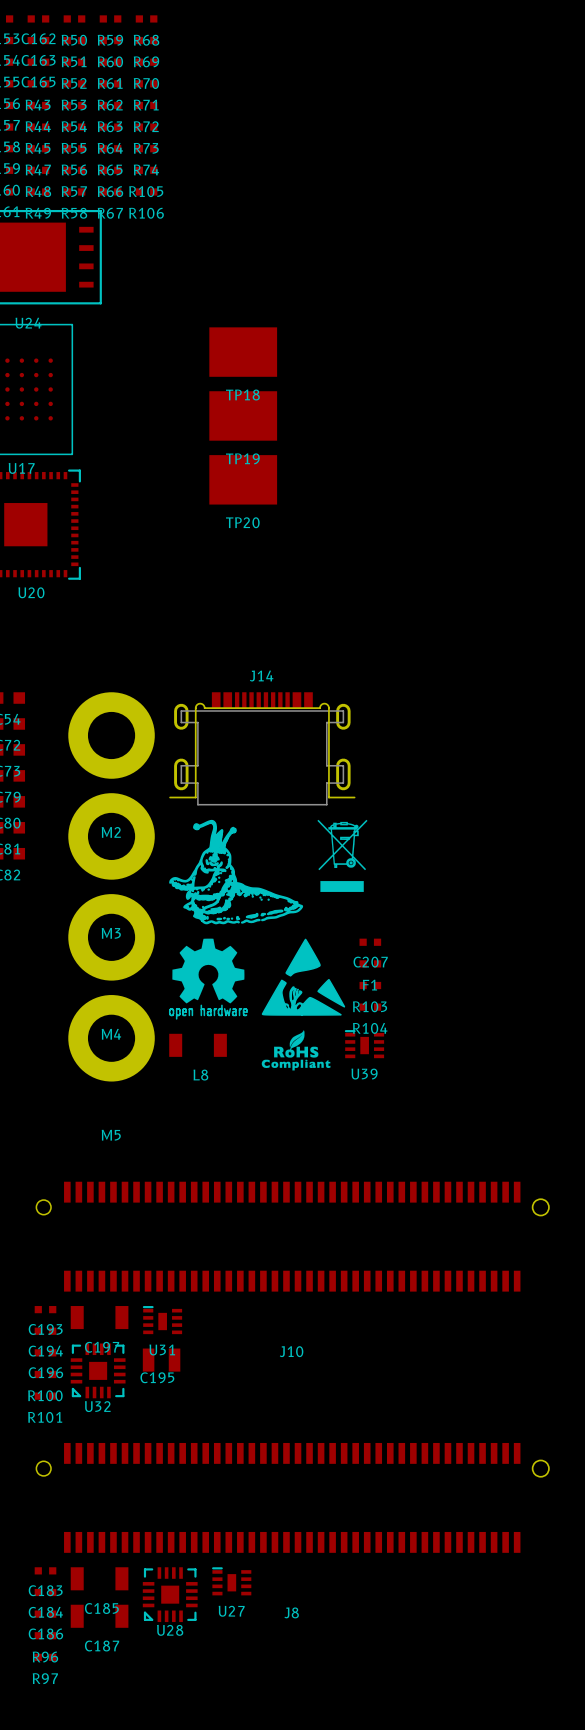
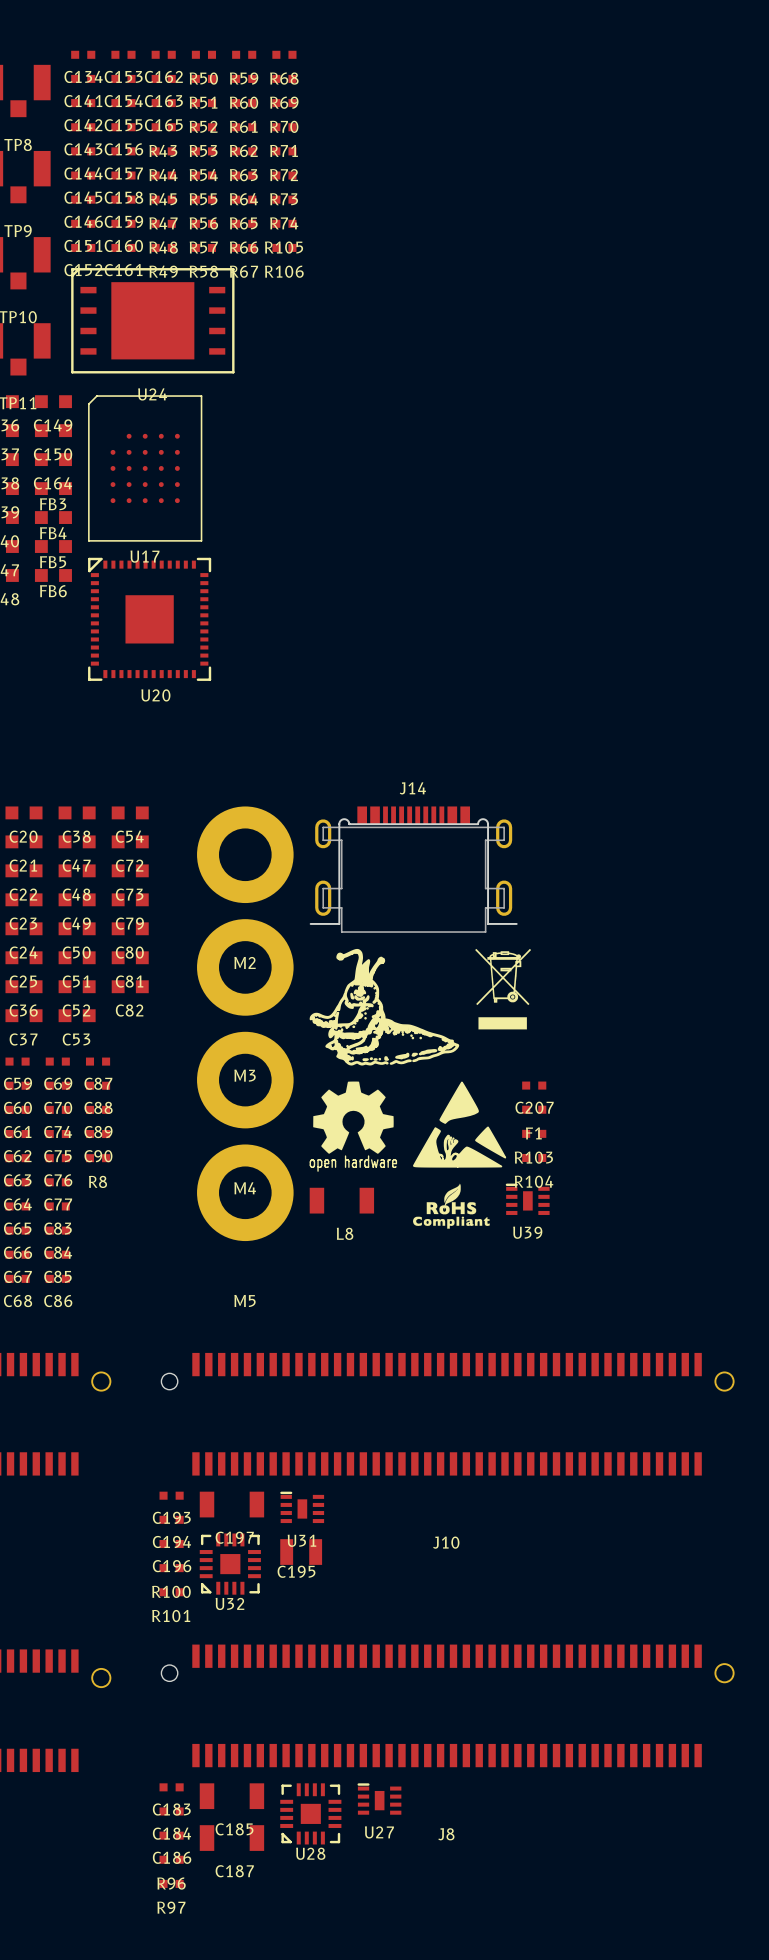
TP18: (243, 352) -> none
TP19: (243, 415) -> none
TP20: (243, 479) -> none

